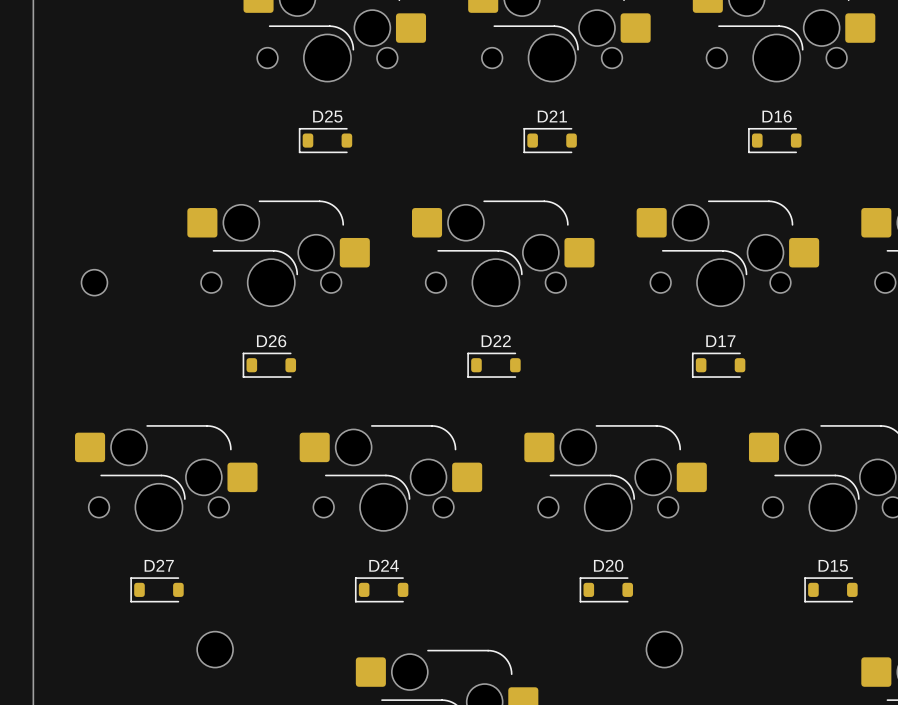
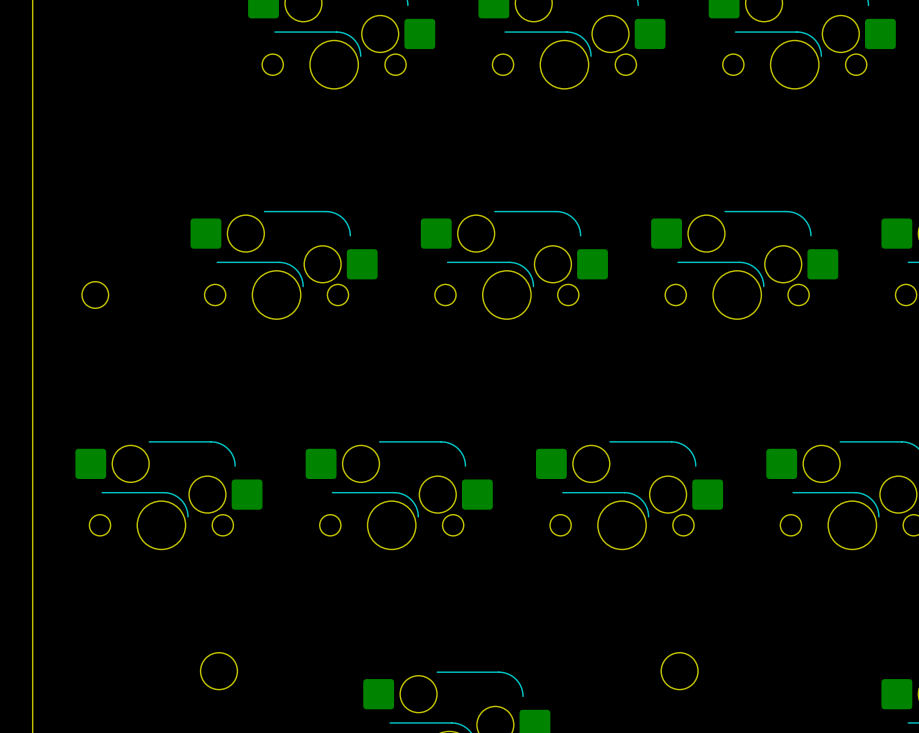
D25: (325, 140) -> none
D21: (550, 140) -> none
D16: (774, 140) -> none
D26: (269, 365) -> none
D22: (494, 365) -> none
D17: (718, 365) -> none
D27: (157, 589) -> none
D24: (381, 589) -> none
D20: (606, 589) -> none
D15: (831, 589) -> none

